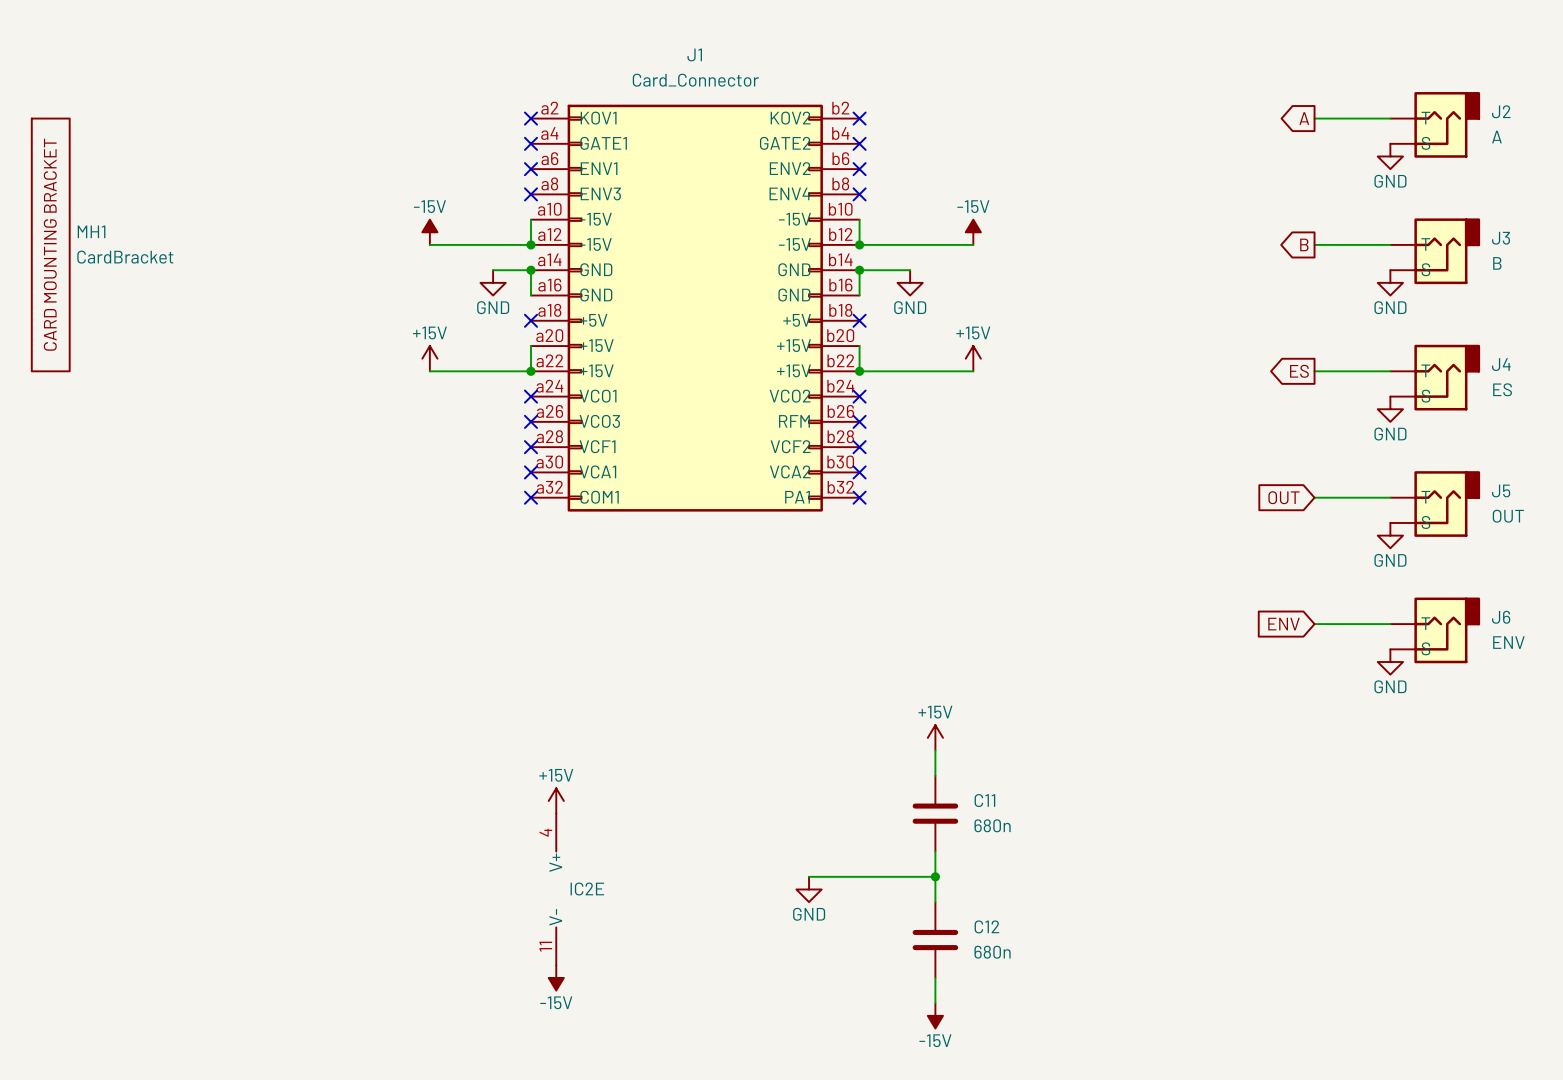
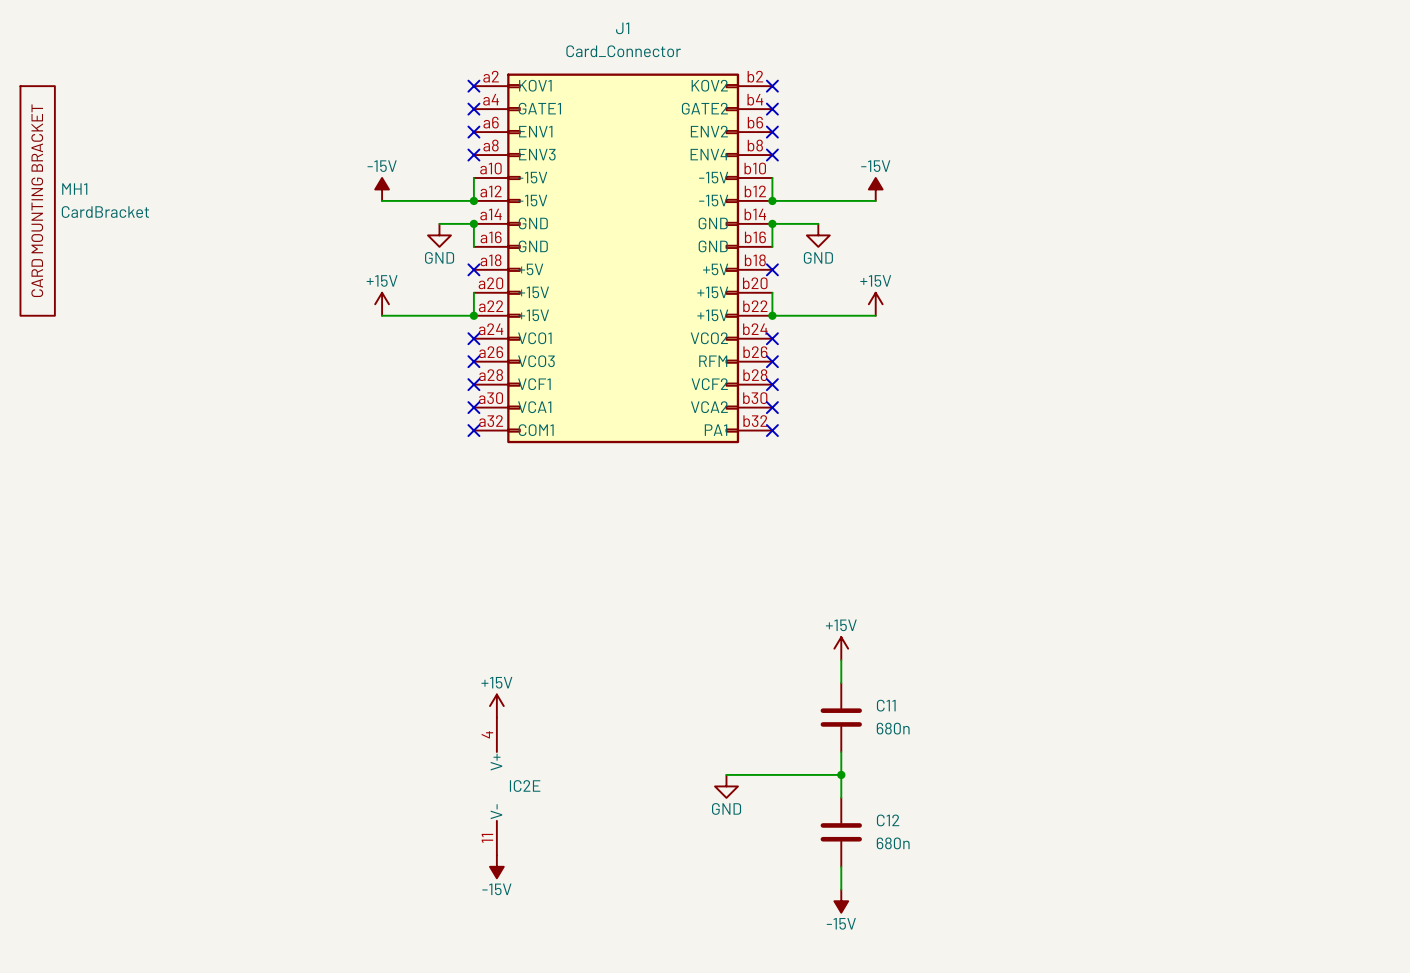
global label: A (1304, 118) -> none
wire: (1314, 118) (1390, 118) -> none
J2: A (1435, 124) -> none
power symbol: GND (1390, 156) -> none
global label: B (1304, 244) -> none
wire: (1314, 244) (1390, 244) -> none
J3: B (1435, 251) -> none
power symbol: GND (1390, 282) -> none
global label: ES (1299, 371) -> none
wire: (1314, 371) (1390, 371) -> none
J4: ES (1435, 377) -> none
power symbol: GND (1390, 409) -> none
global label: OUT (1283, 497) -> none
wire: (1314, 497) (1390, 497) -> none
J5: OUT (1435, 504) -> none
power symbol: GND (1390, 535) -> none
global label: ENV (1283, 624) -> none
wire: (1314, 624) (1390, 624) -> none
J6: ENV (1435, 630) -> none
power symbol: GND (1390, 661) -> none

